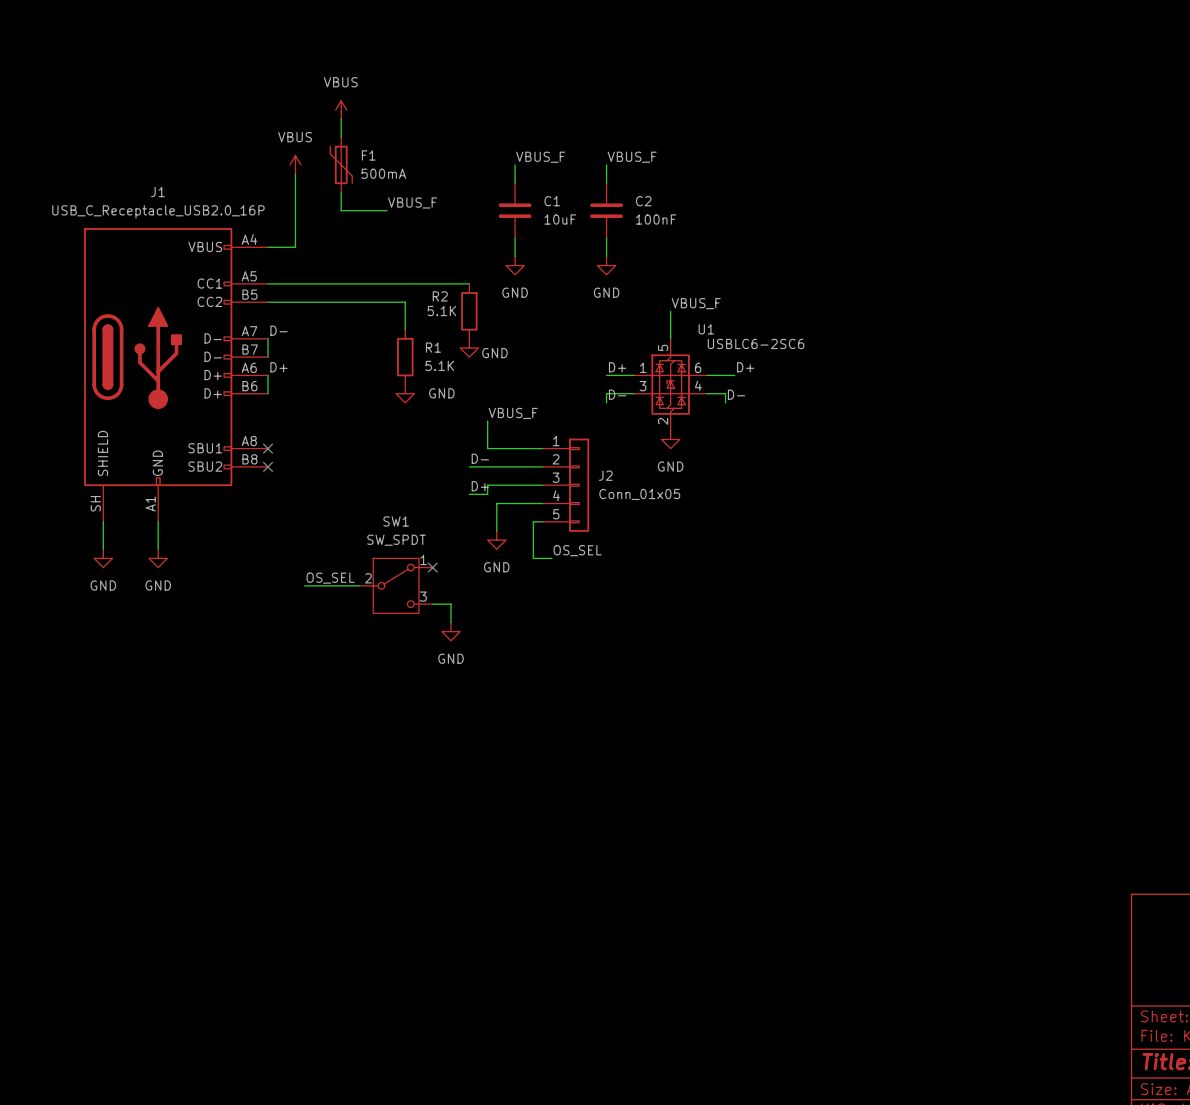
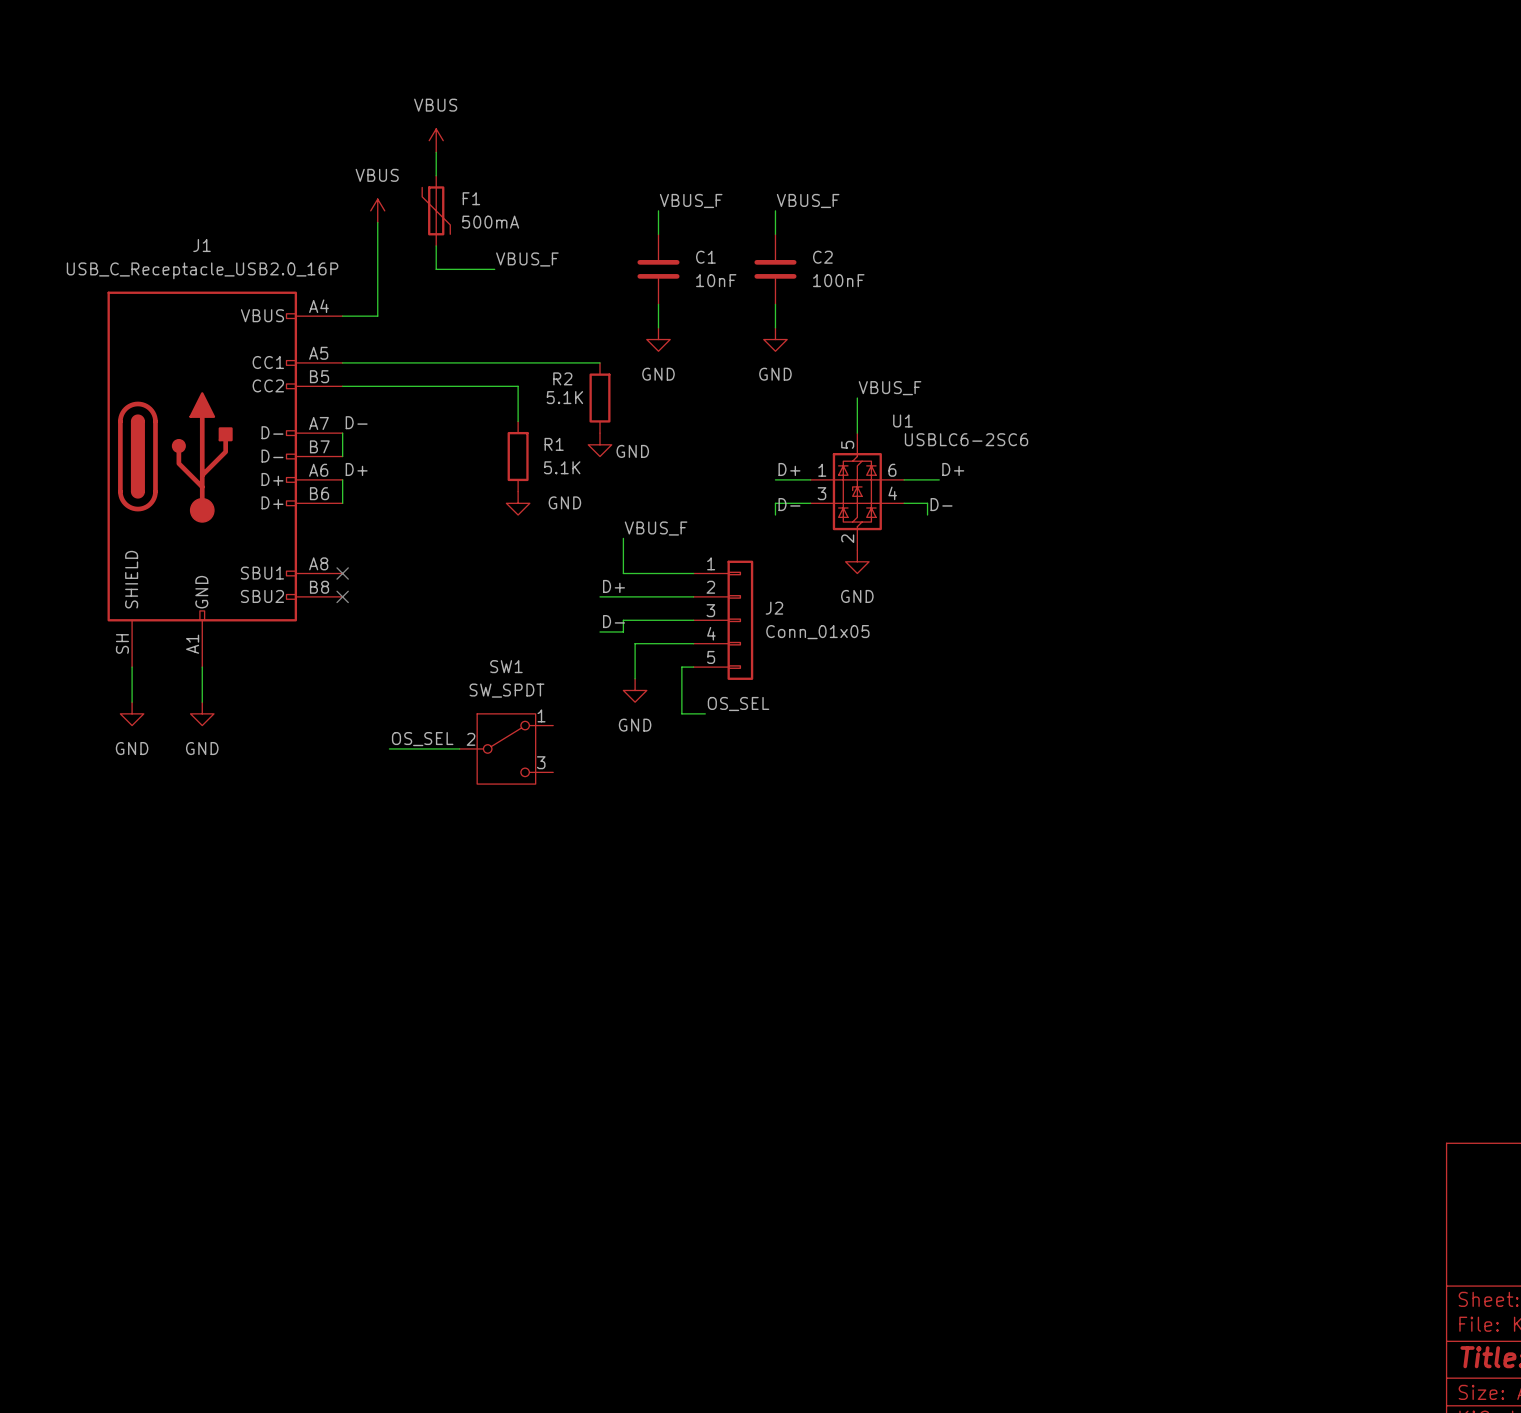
C1 value: 10uF (560, 219) -> 10nF (716, 280)
label: D- (480, 458) -> D+ (614, 586)
label: D+ (480, 486) -> D- (614, 621)
no-connect mark: (432, 567) -> none
wire: (432, 604) (451, 604) (451, 622) -> none
power symbol: GND (451, 631) -> none

